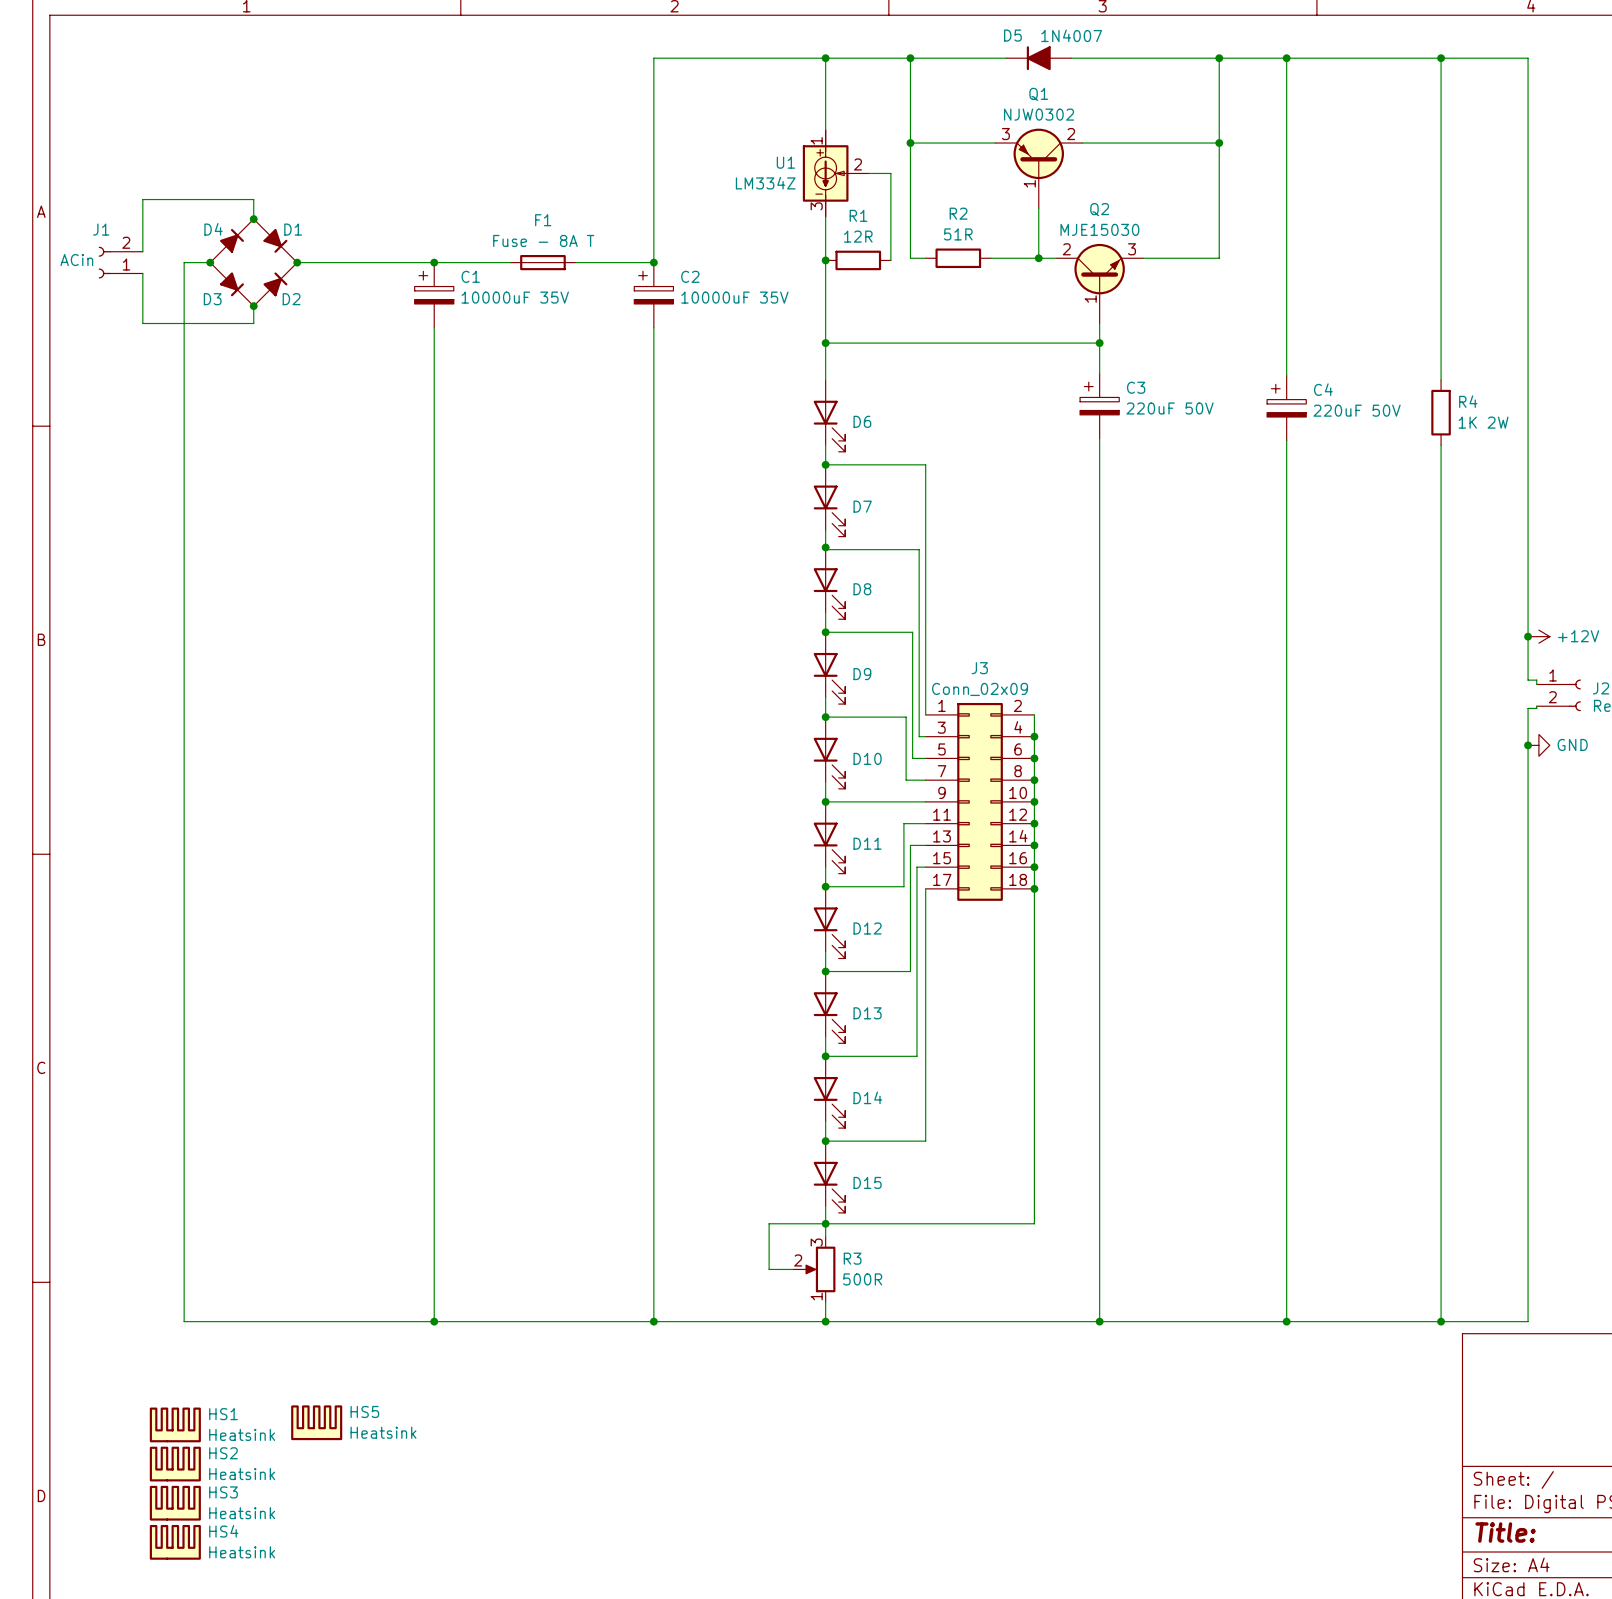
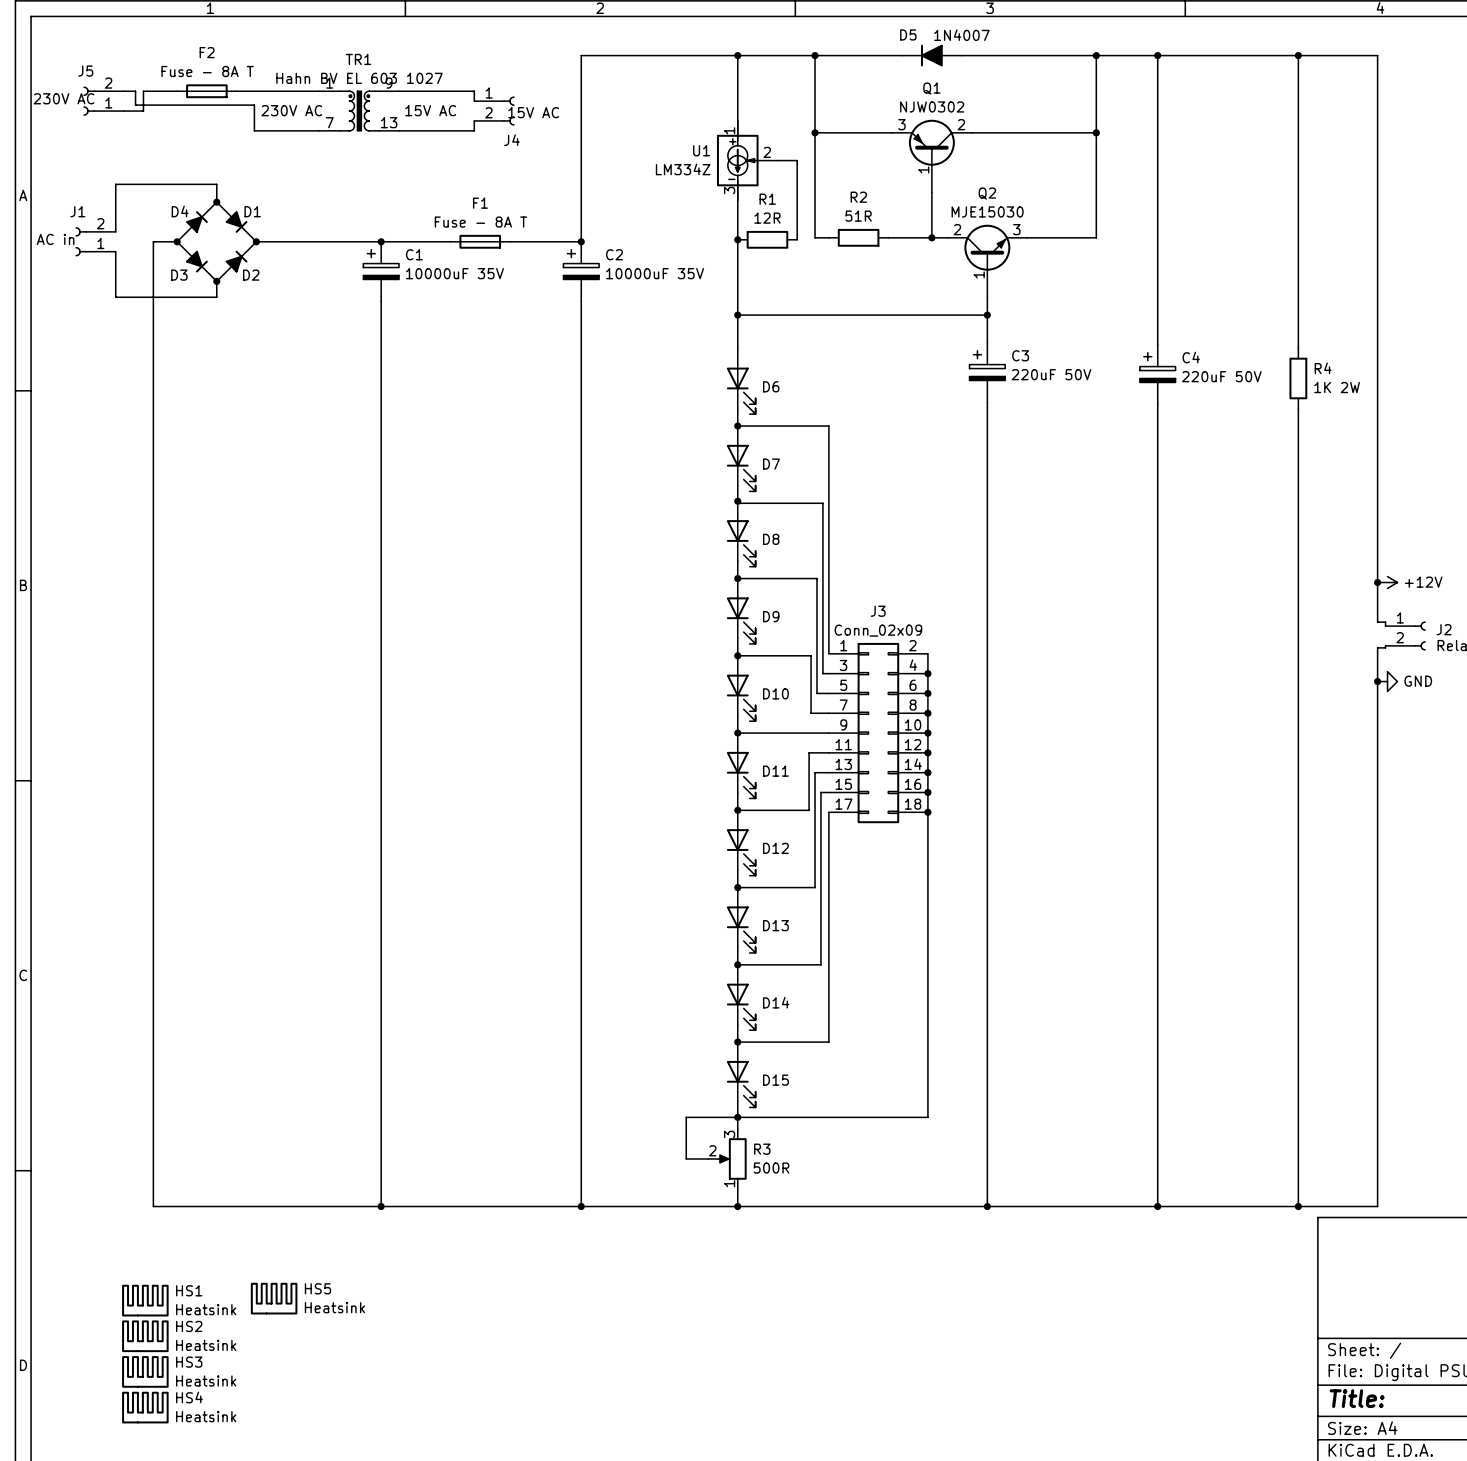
wire: none -> (123, 91) (135, 91) (135, 105) (254, 105) (254, 130) (319, 130)
wire: none -> (177, 91) (143, 91) (143, 111) (123, 111)
F2: none -> Fuse - 8A T (206, 91)
wire: none -> (236, 91) (319, 91)
wire: none -> (399, 91) (474, 91) (474, 101)
J5: none -> 230V AC (103, 101)
TR1: none -> Hahn BV EL 603 1027 (359, 111)
J4: none -> 15V AC (494, 111)
wire: none -> (474, 120) (474, 130) (399, 130)
J1 value: ACin (76, 260) -> AC in (55, 239)

